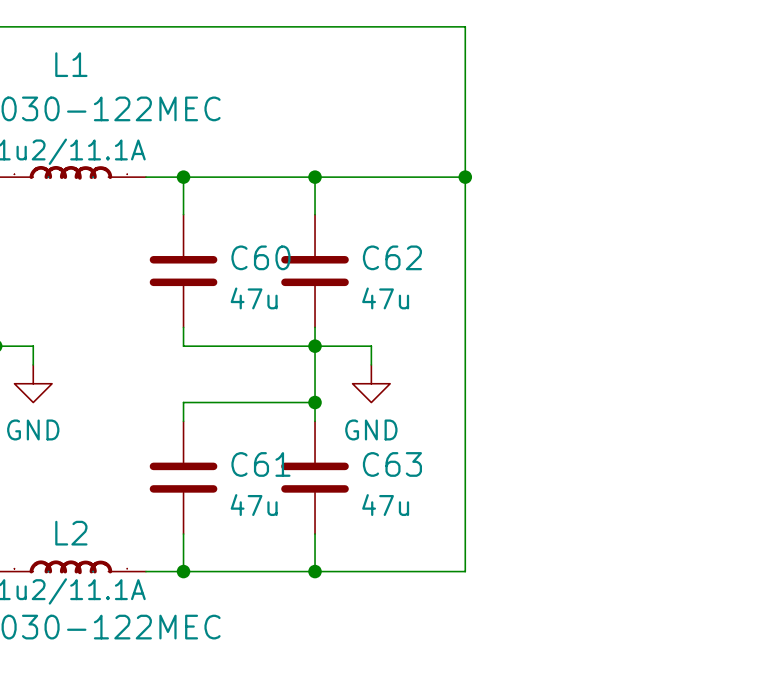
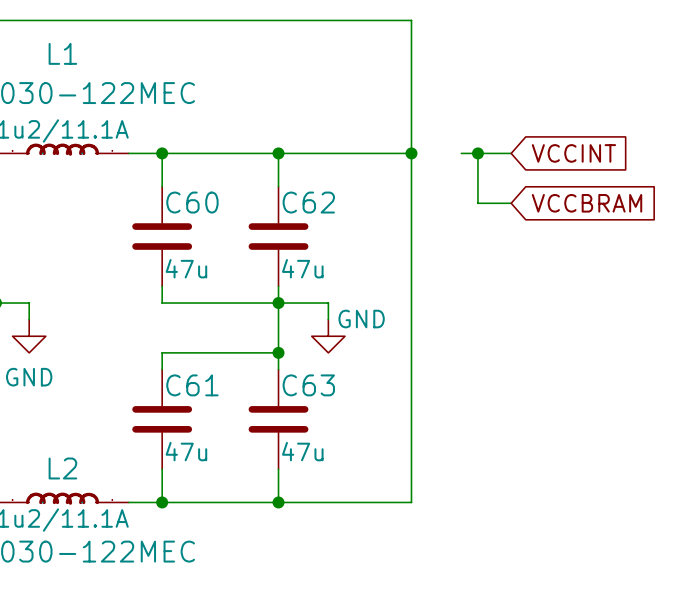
wire: none -> (461, 153) (511, 153)
wire: none -> (477, 153) (477, 203) (511, 203)
junction: none -> (477, 153)
global label: none -> VCCINT (573, 153)
global label: none -> VCCBRAM (587, 203)
C60 name position: C60 (260, 257) -> C60 (192, 202)
C62 name position: C62 (392, 257) -> C62 (308, 202)
C60 text position: 47u (254, 298) -> 47u (186, 268)
C62 text position: 47u (385, 298) -> 47u (302, 268)
power symbol text position: GND (371, 429) -> GND (361, 319)
C61 name position: C61 (260, 464) -> C61 (192, 385)
C63 name position: C63 (392, 464) -> C63 (308, 385)
C61 text position: 47u (254, 505) -> 47u (186, 451)
C63 text position: 47u (385, 505) -> 47u (302, 451)

